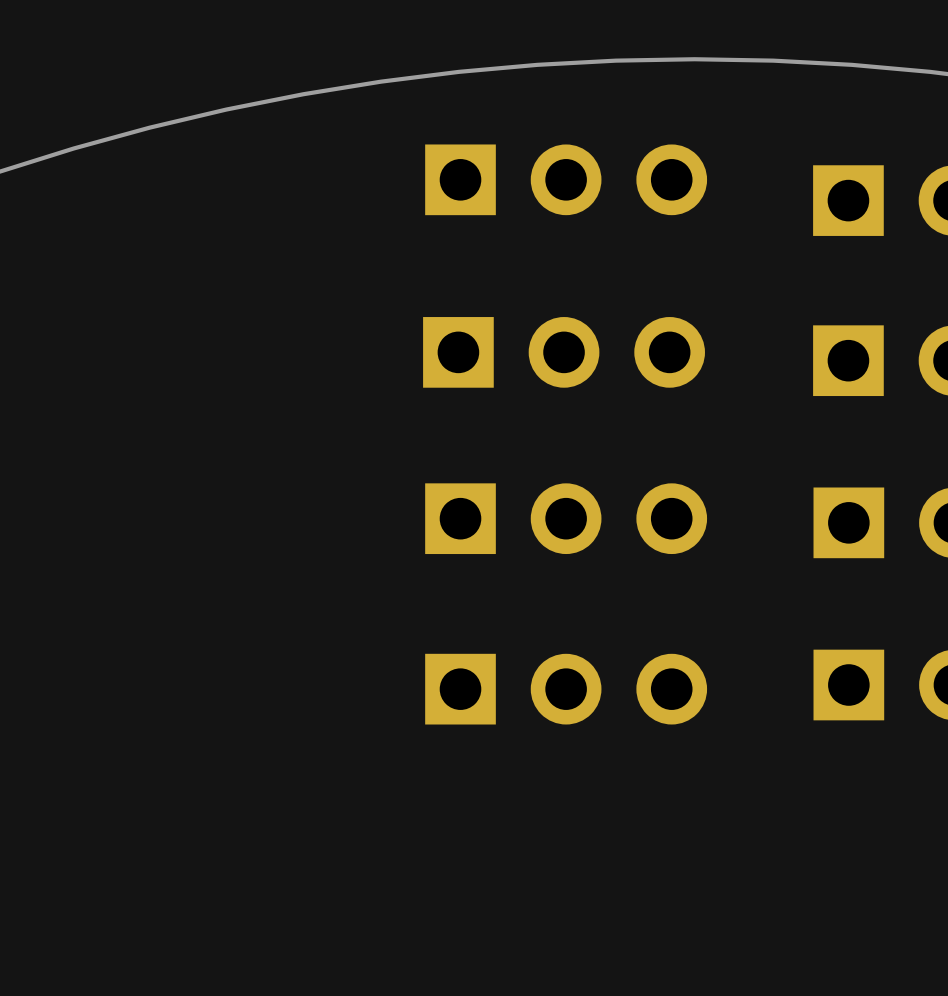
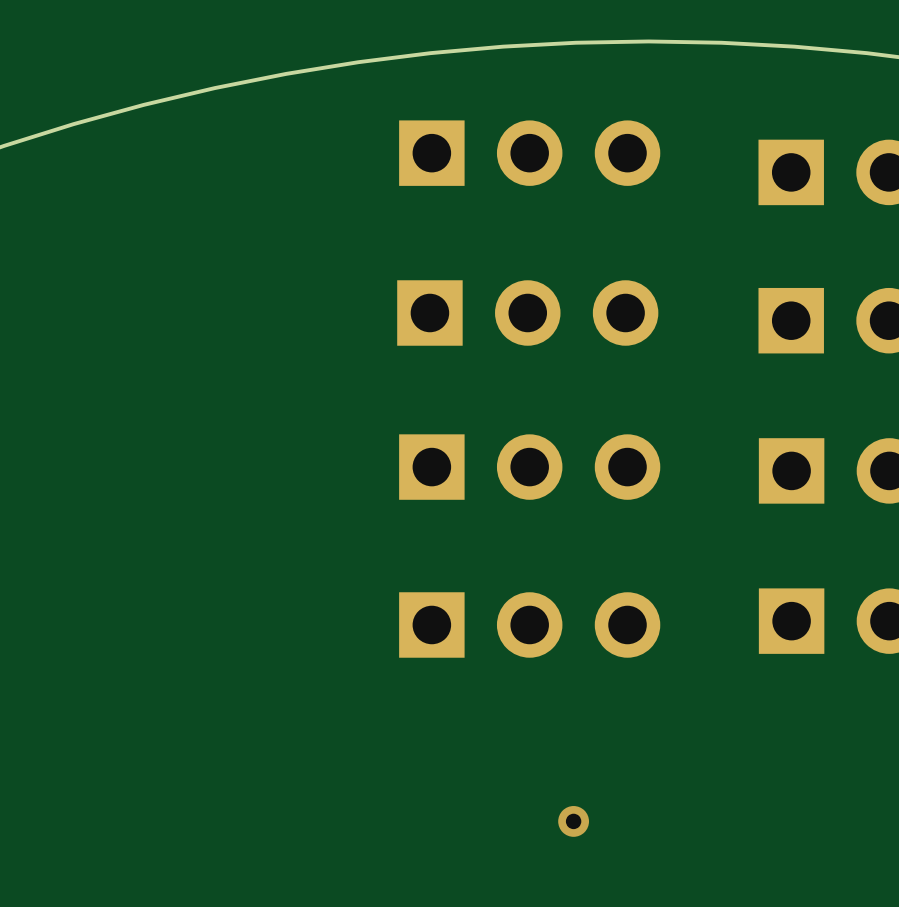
via: none -> (573, 821)

